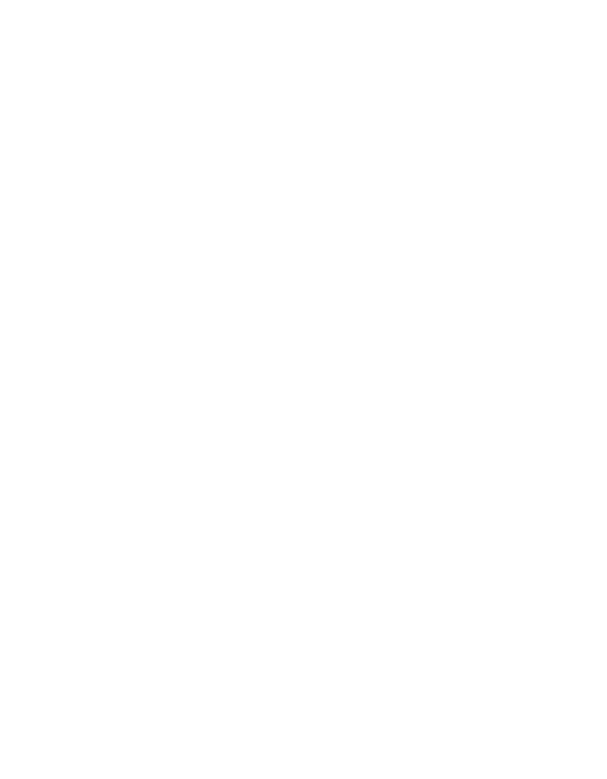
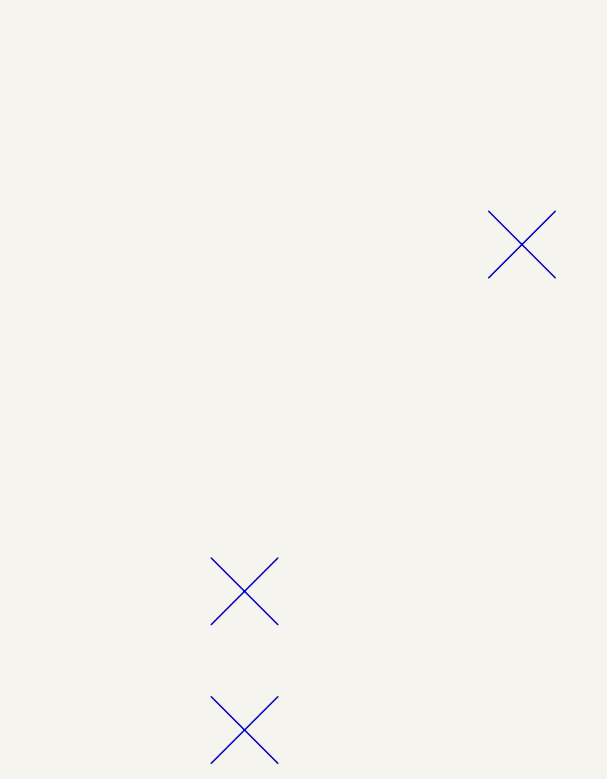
no-connect mark: none -> (521, 244)
no-connect mark: none -> (244, 591)
no-connect mark: none -> (244, 730)

